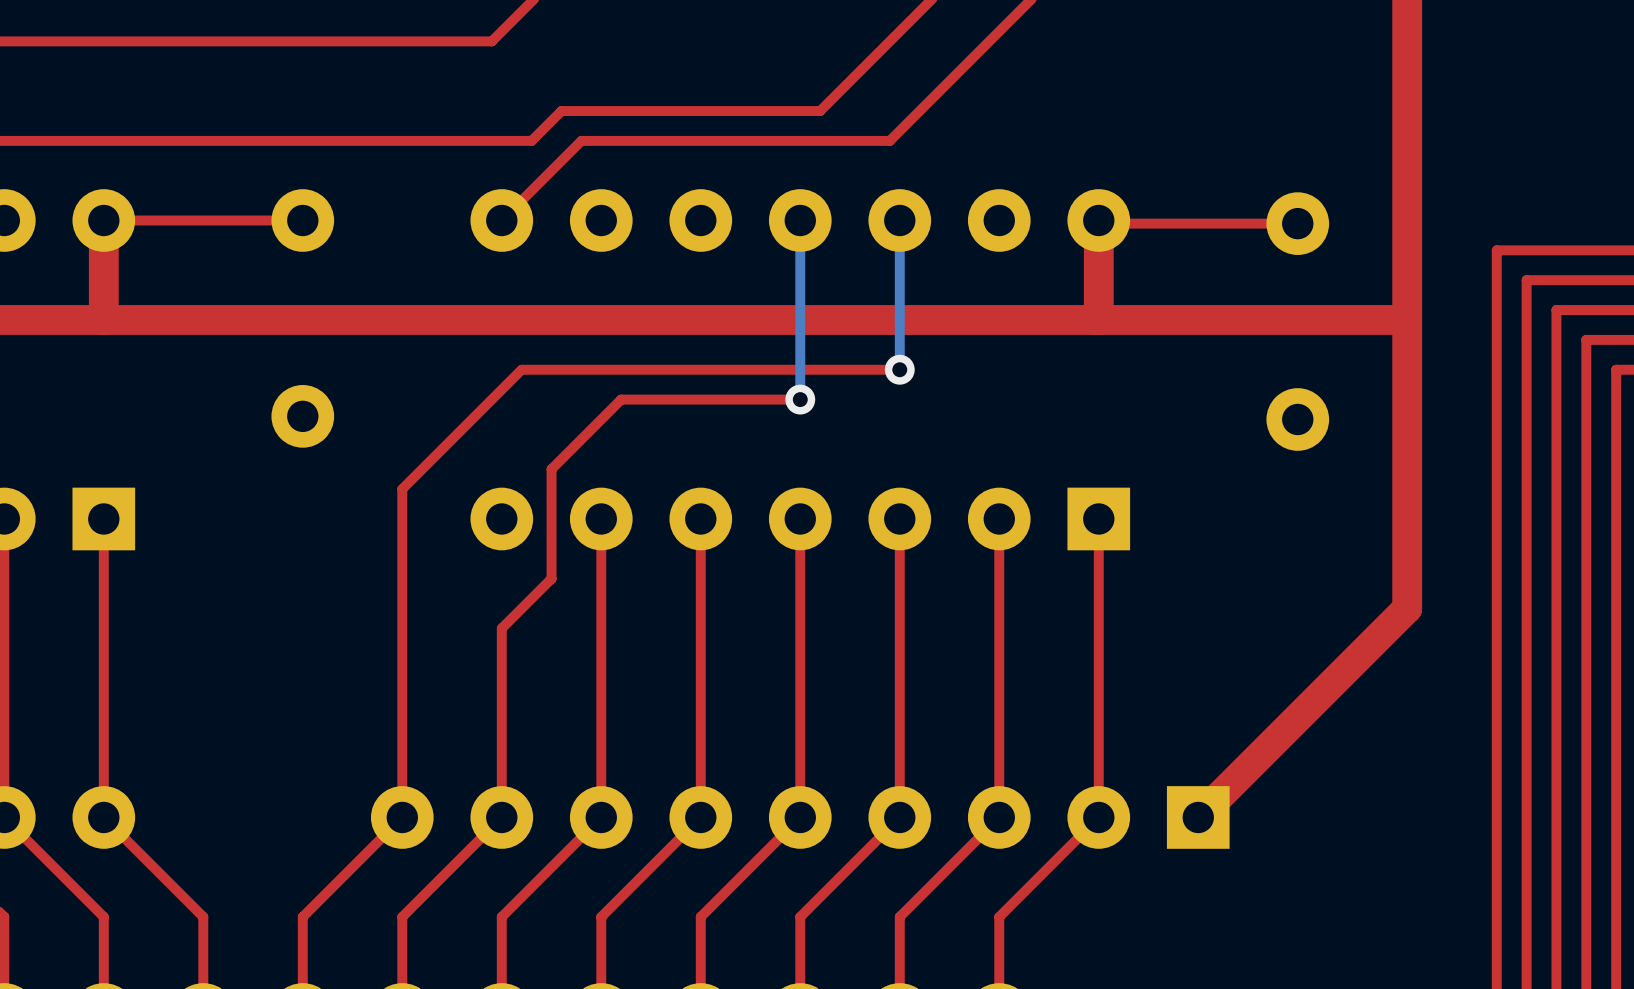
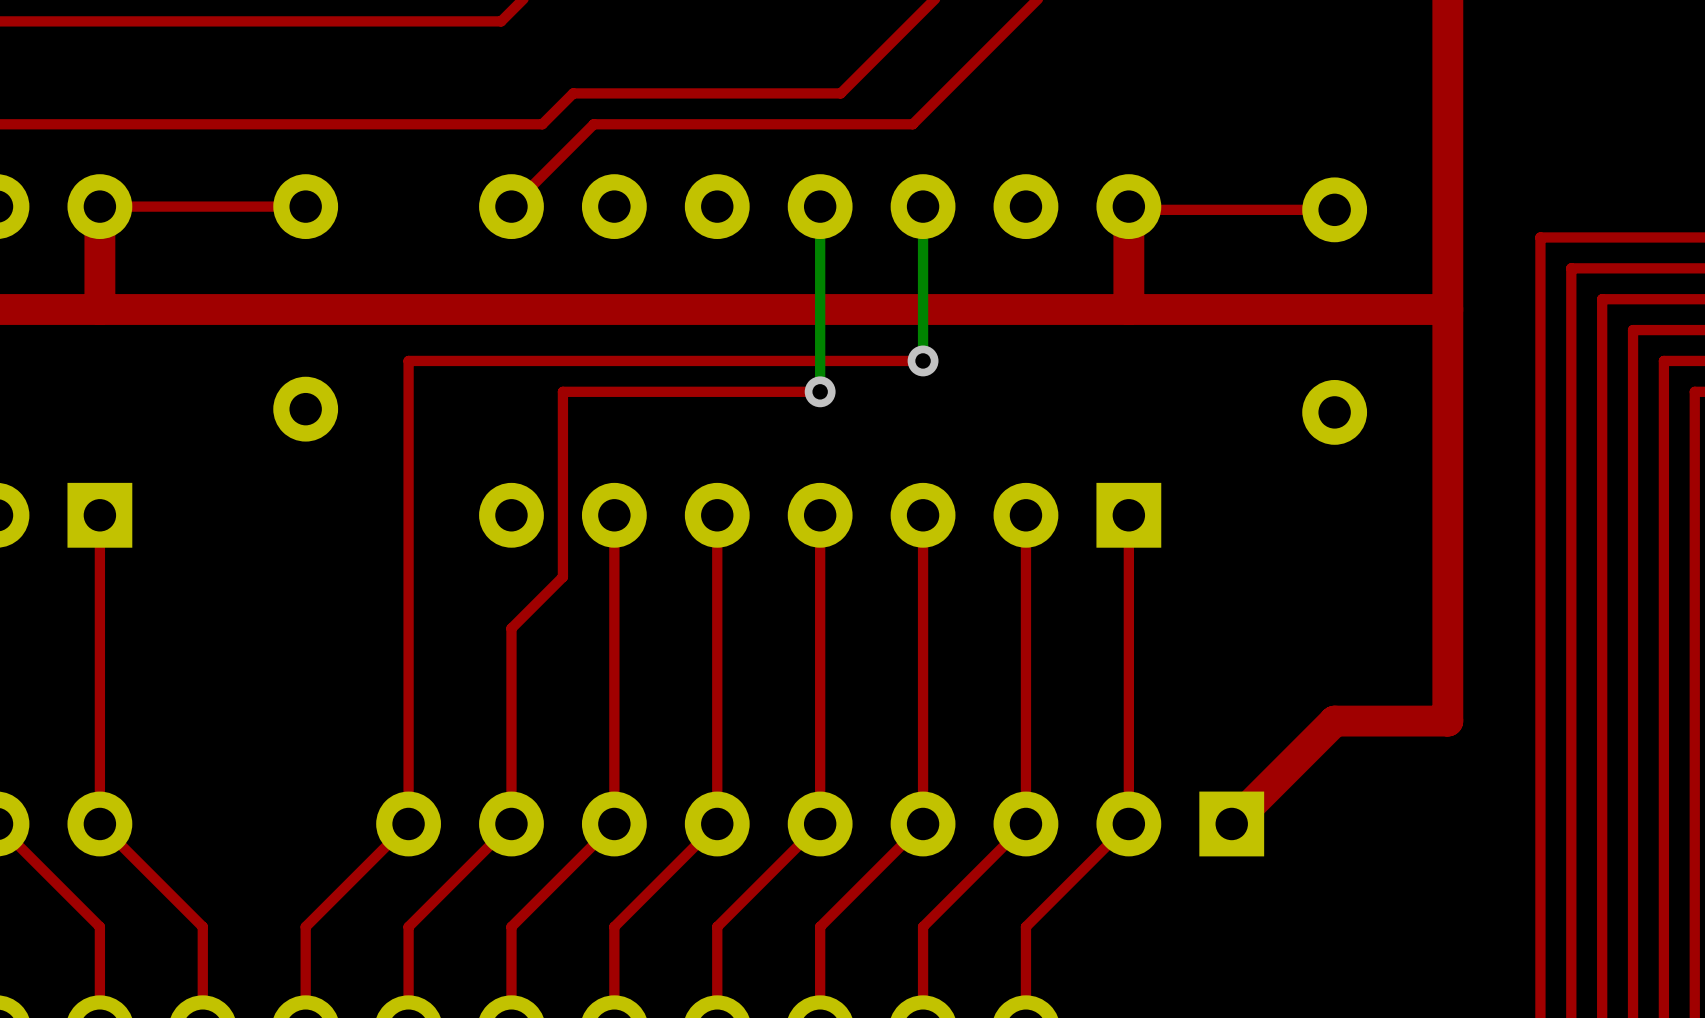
top track: (521, 369) (402, 489) -> (532, 360) (408, 360) (408, 484)
top track: (621, 399) (551, 469) -> (634, 391) (562, 391) (562, 463)
top track: (1407, 608) (1297, 717) -> (1447, 607) (1447, 721) (1334, 721)

